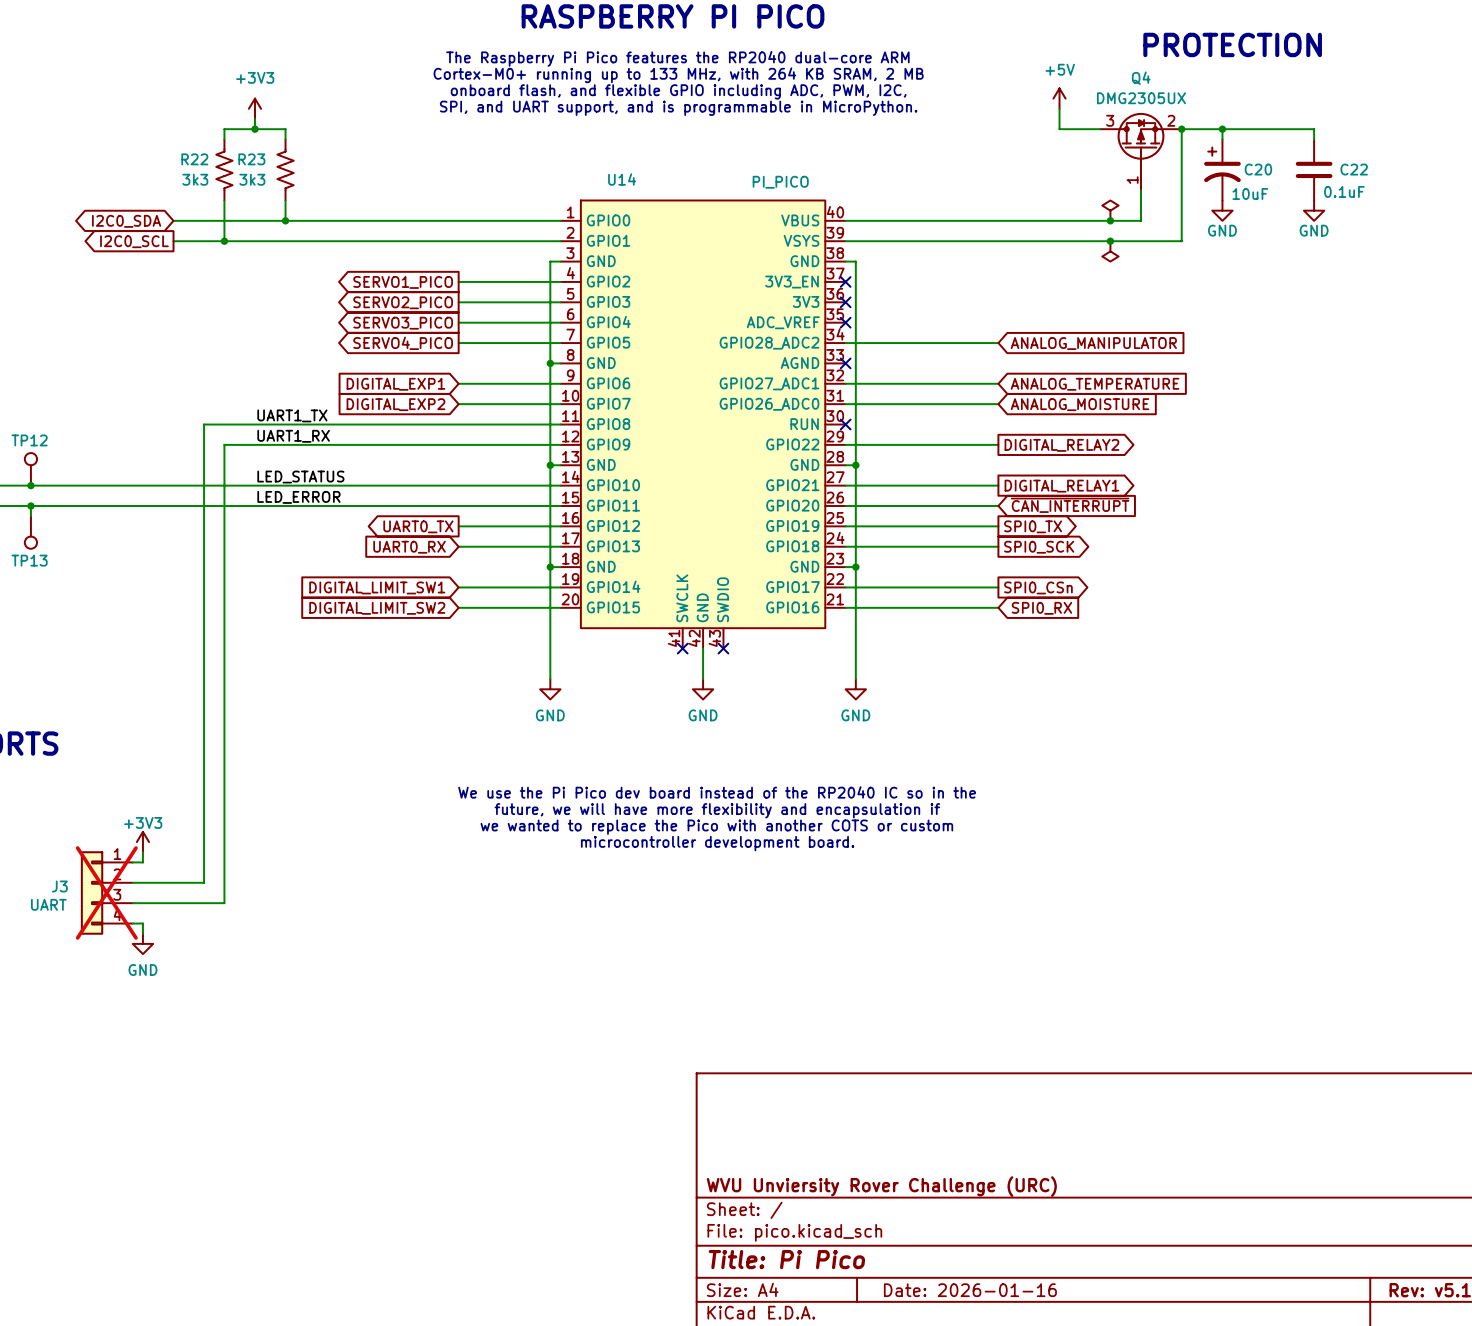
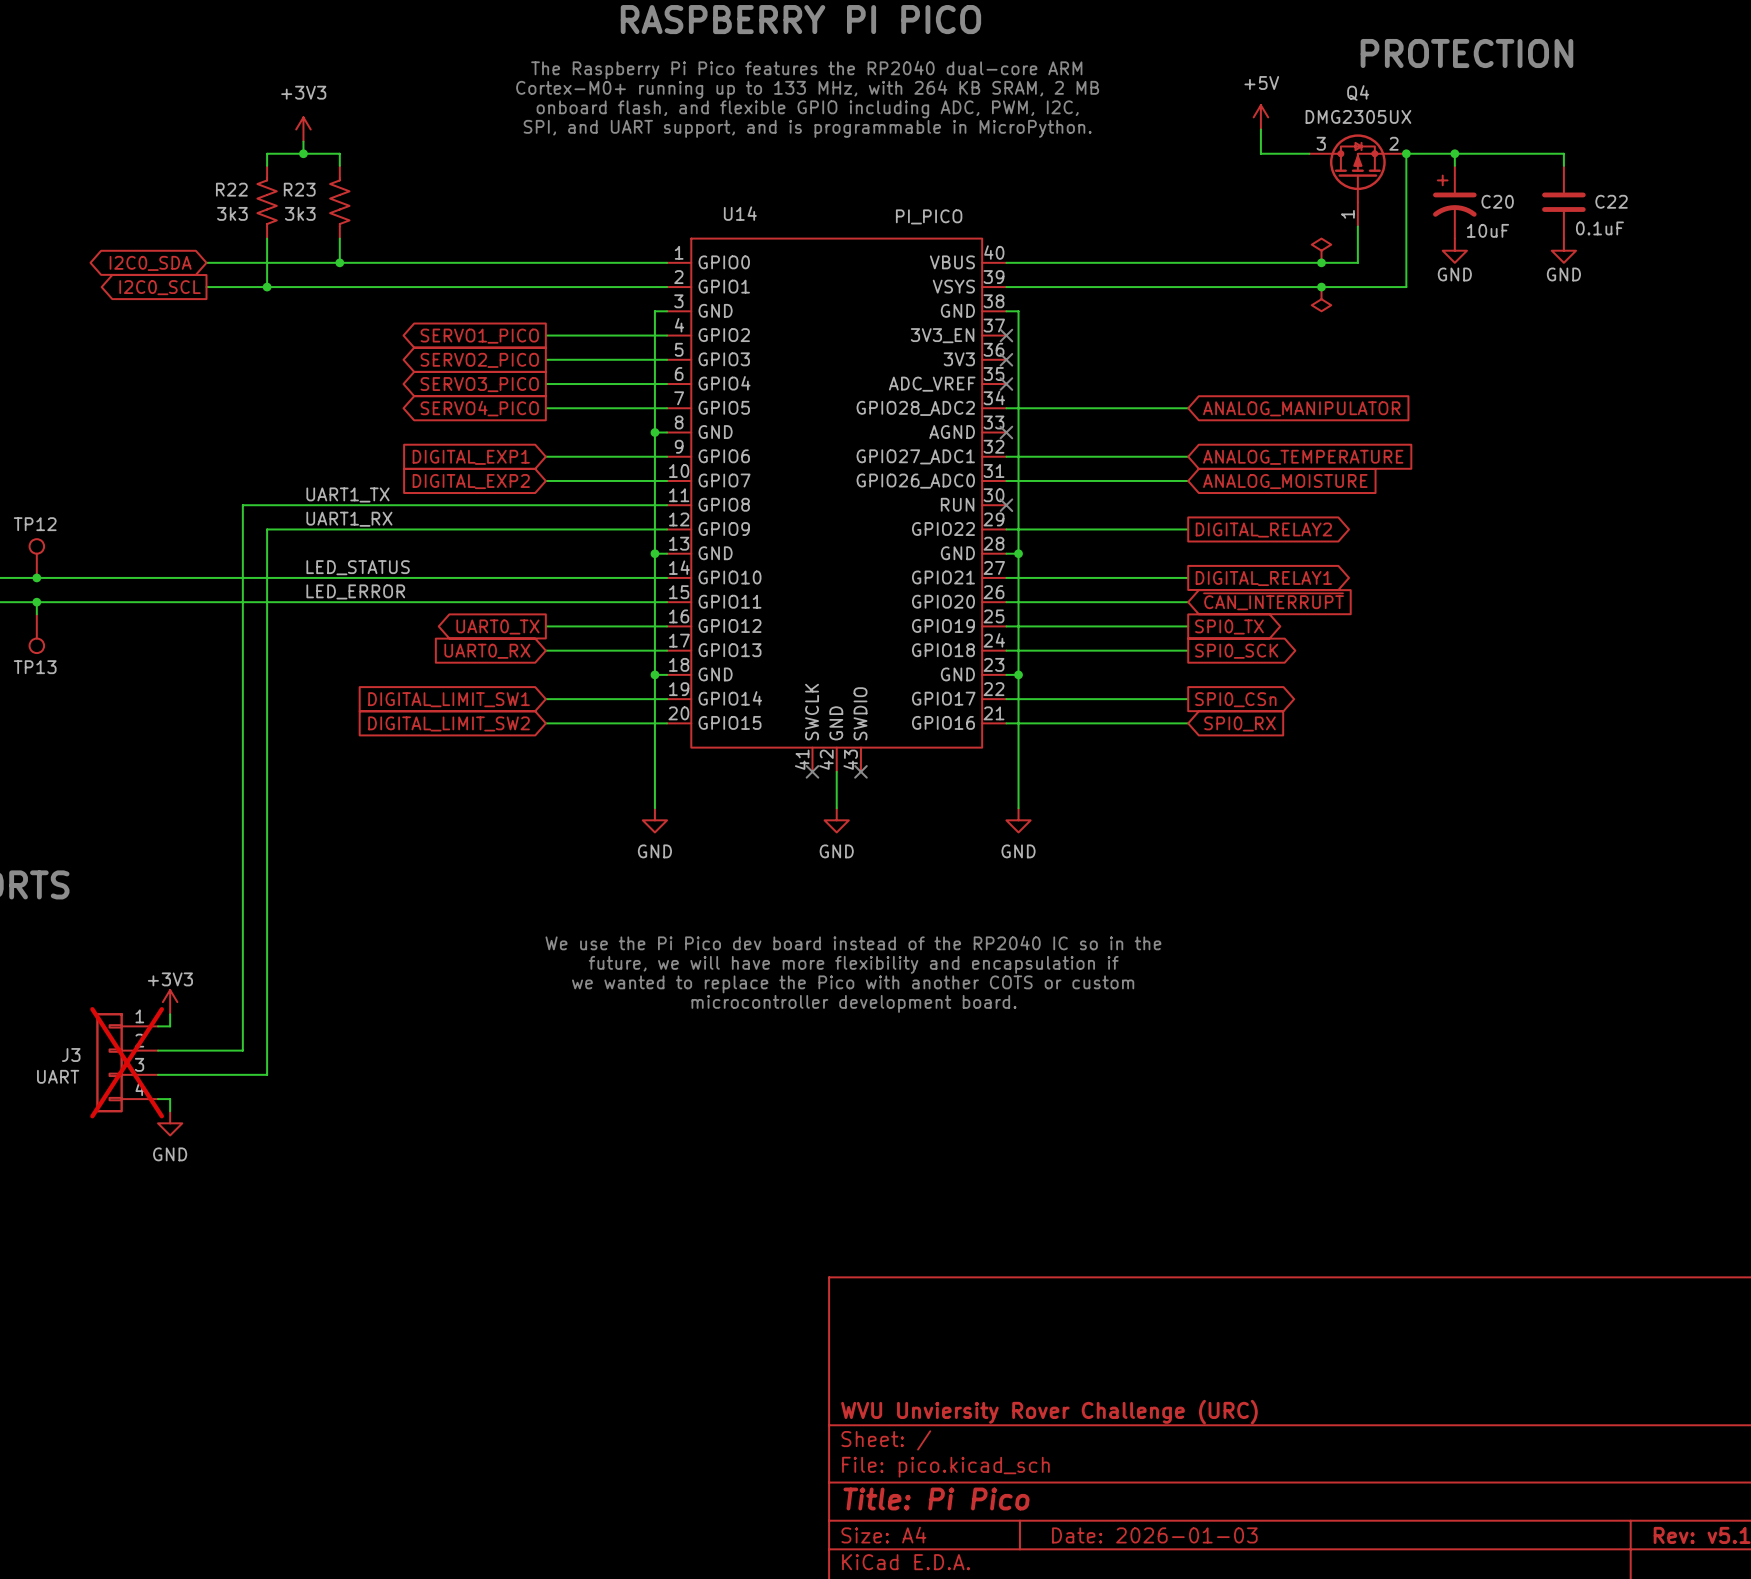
title block: Date: 2026-01-16 (970, 1290) -> Date: 2026-01-03 (1154, 1535)

